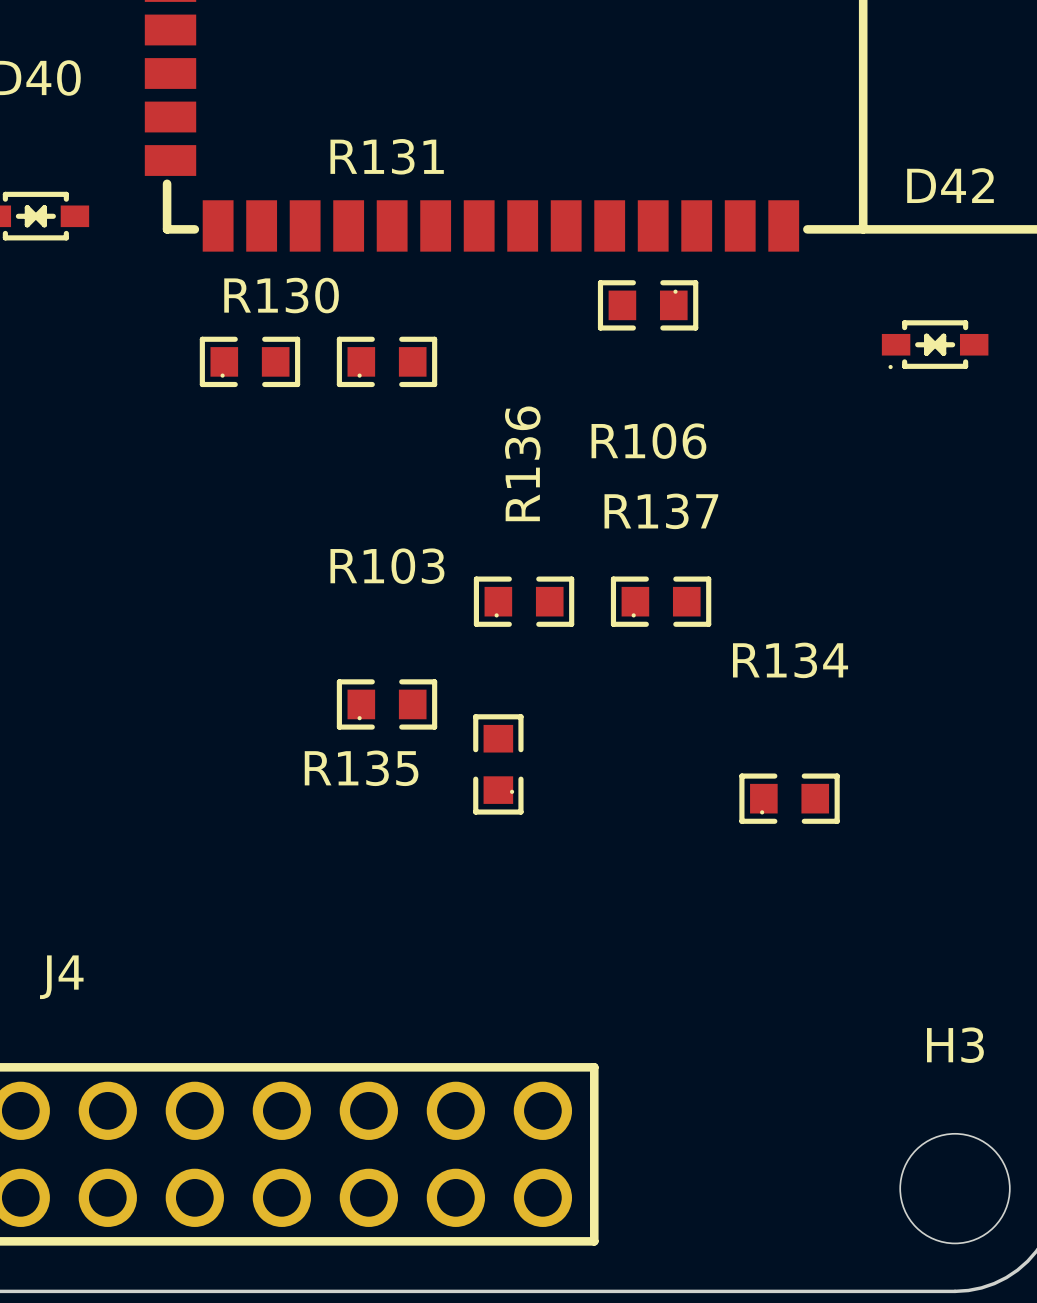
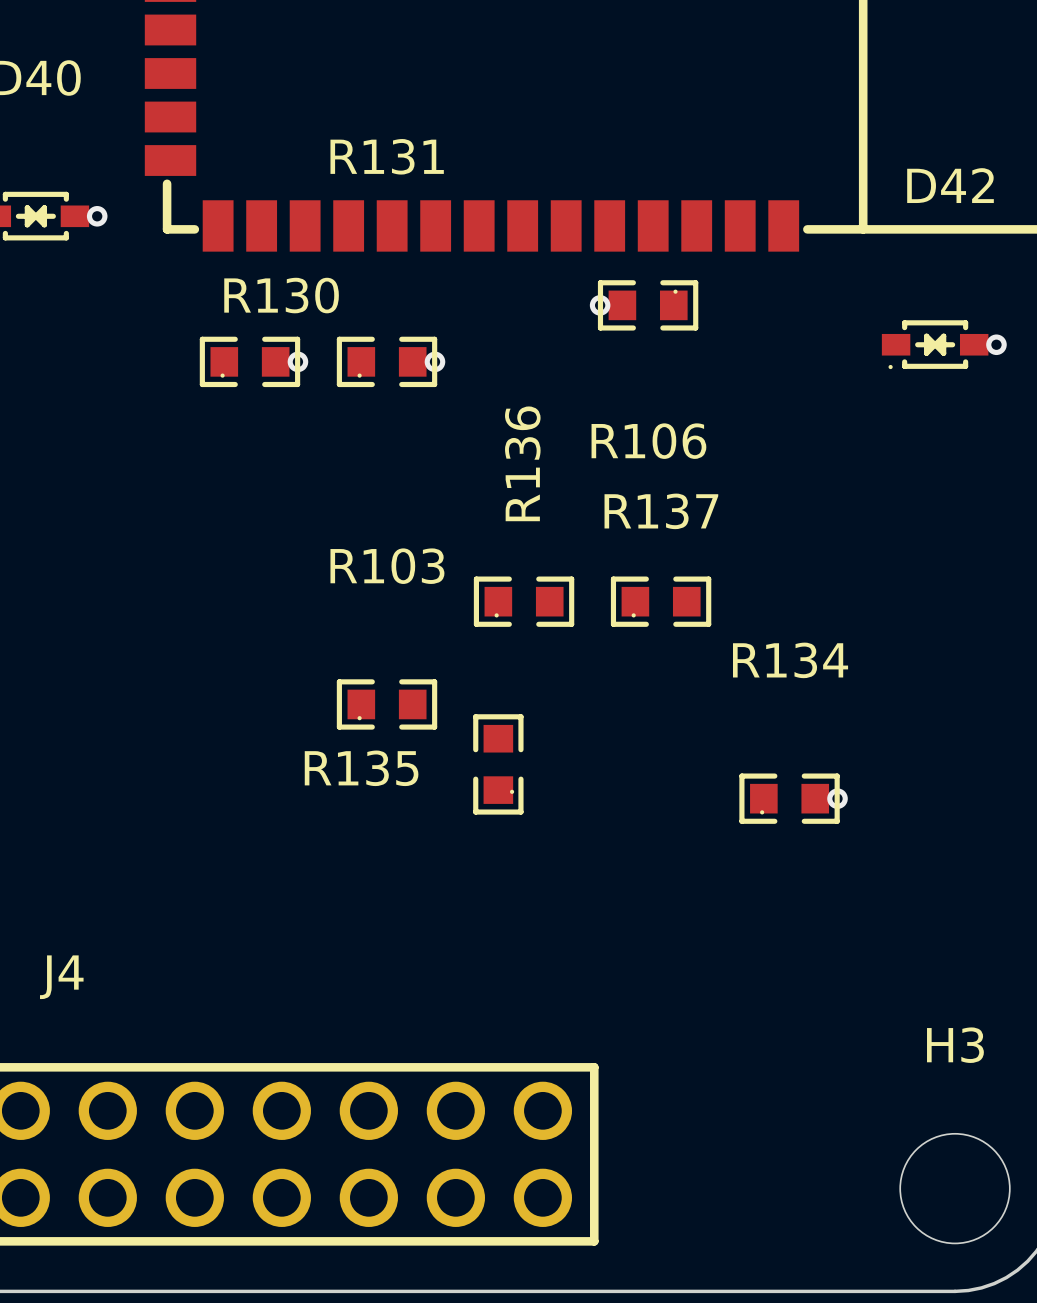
via: none -> (97, 216)
via: none -> (600, 305)
via: none -> (996, 344)
via: none -> (297, 361)
via: none -> (434, 361)
via: none -> (837, 798)

